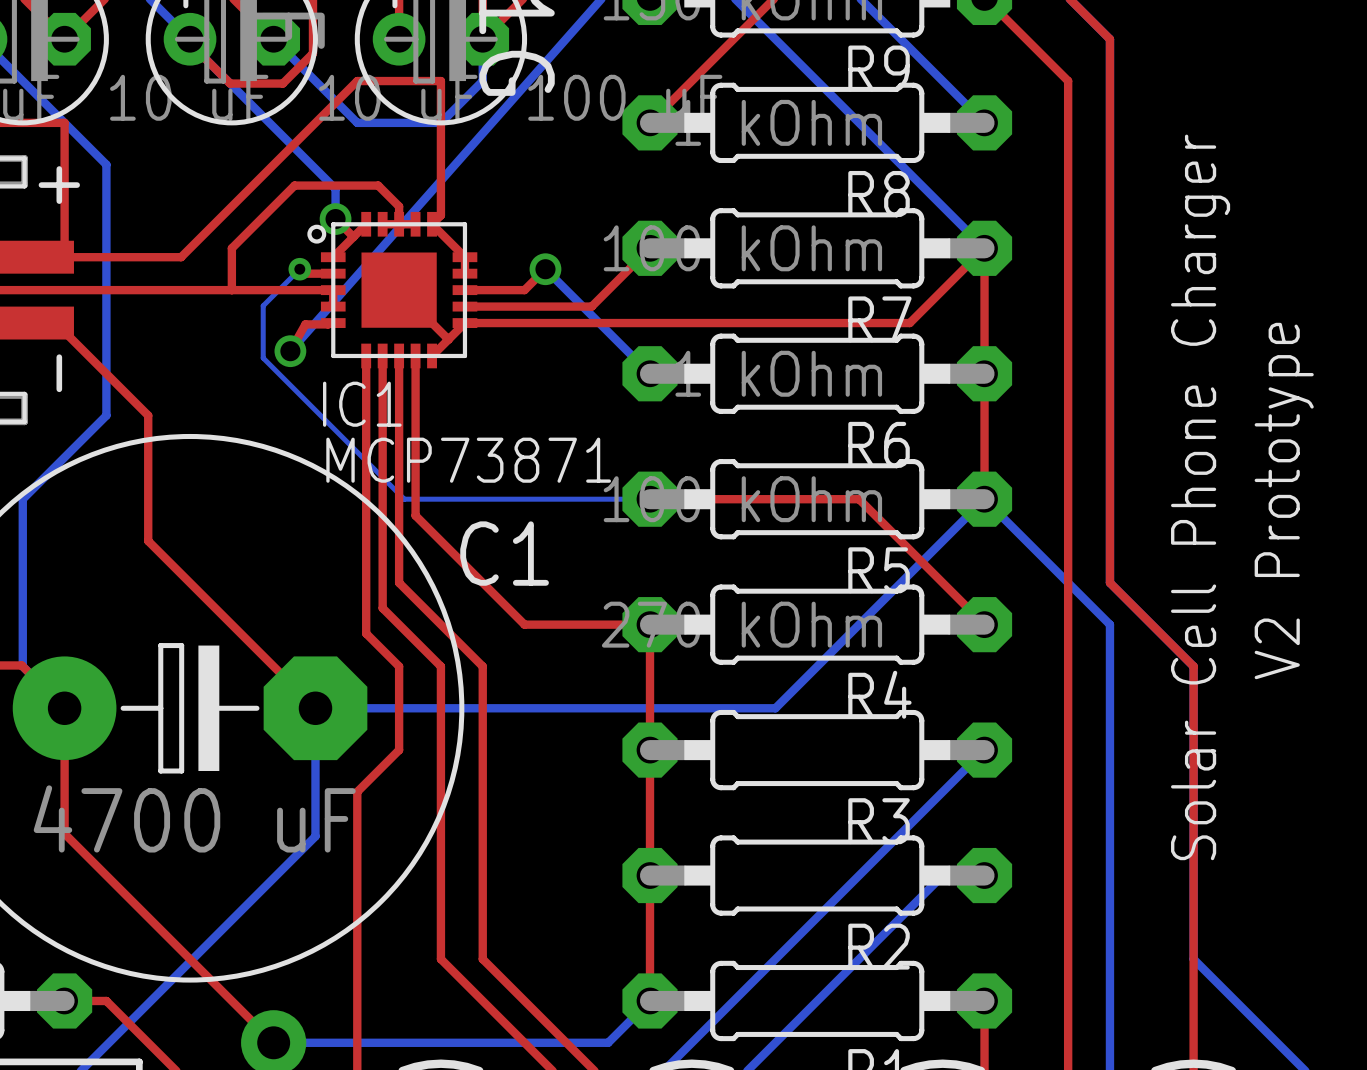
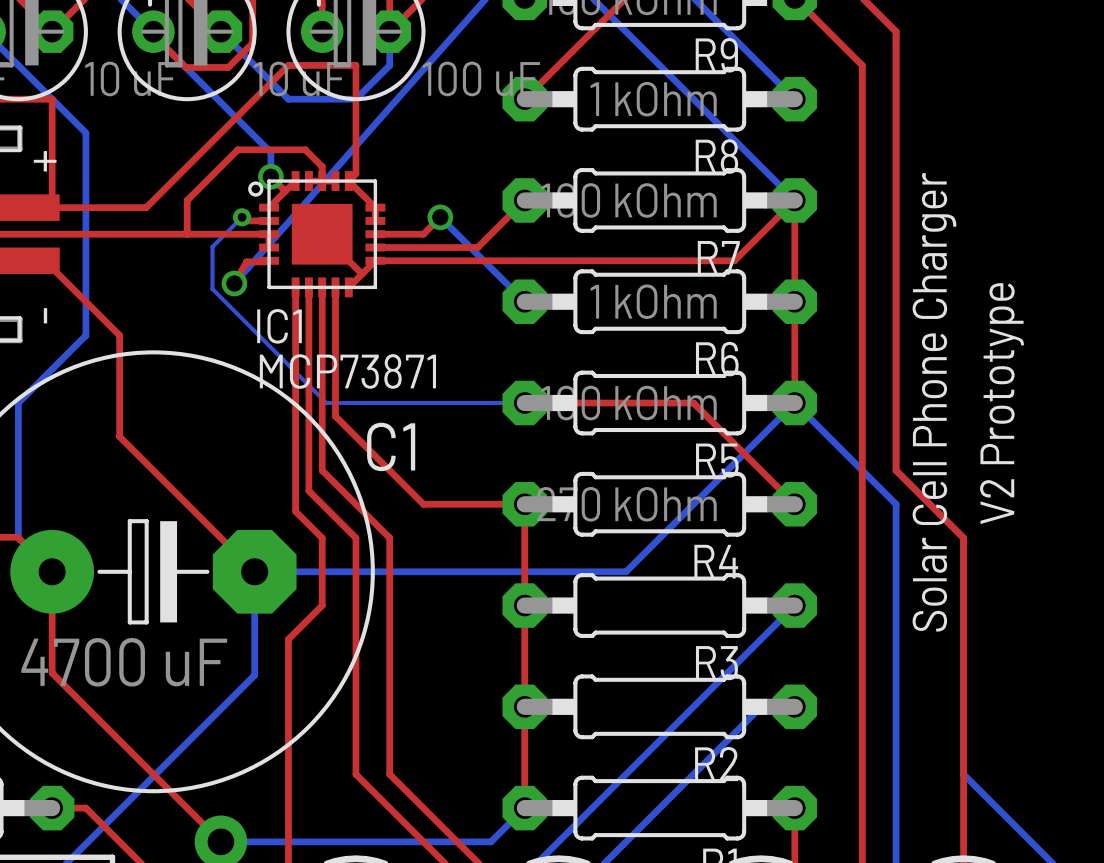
text position: Solar Cell Phone Charger (1200, 497) -> Solar Cell Phone Charger (934, 402)
text position: V2 Prototype (1284, 500) -> V2 Prototype (1001, 403)

